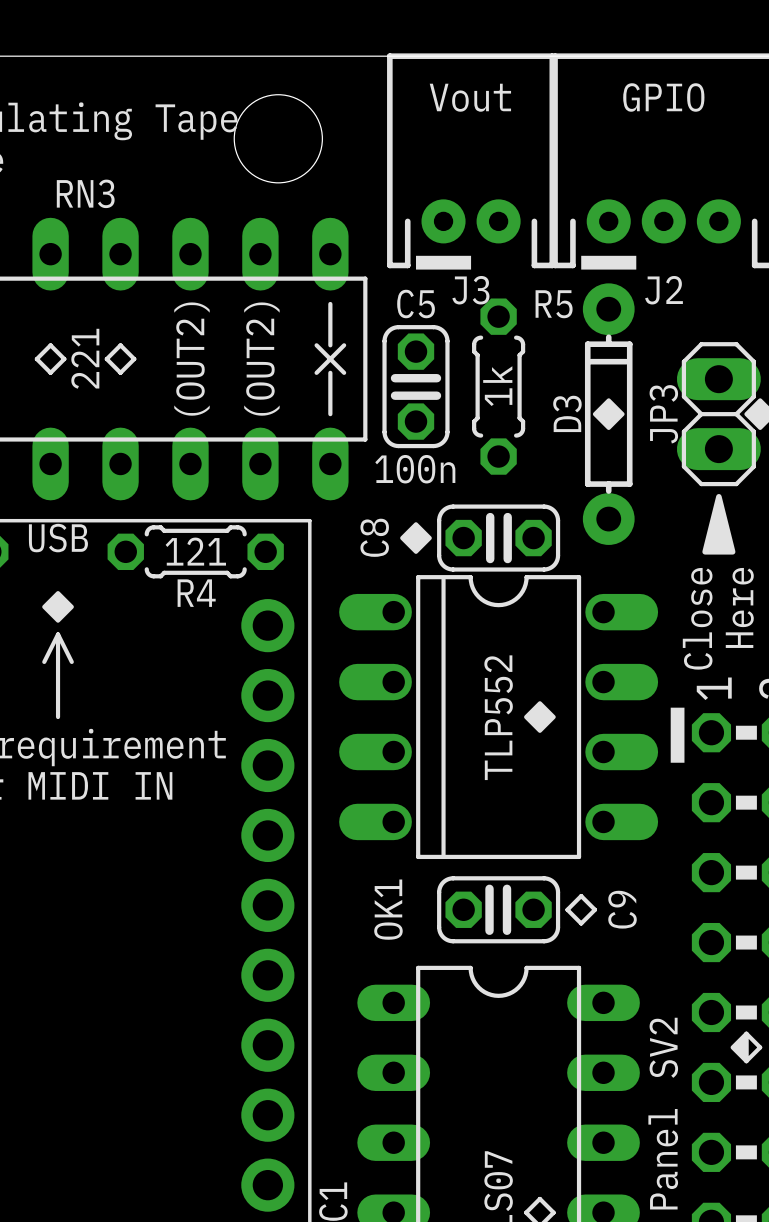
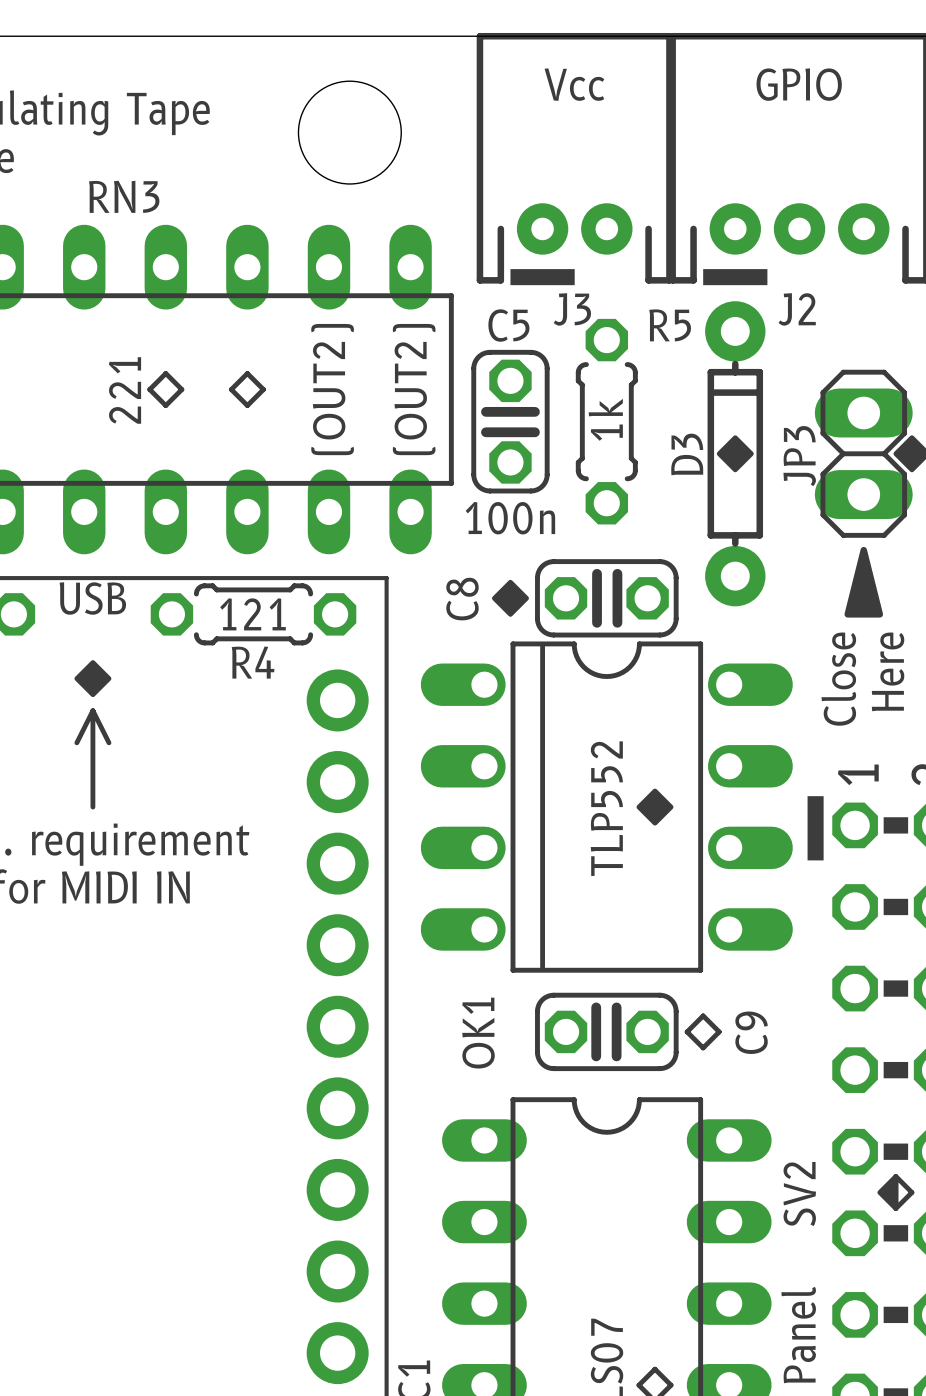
text: Vout (470, 97) -> Vcc (574, 84)
line: (330, 304) (330, 345) -> none
line: (50, 345) (36, 359) (50, 372) (64, 359) (50, 345) -> (247, 373) (231, 389) (247, 405) (263, 389) (247, 373)
line: (316, 345) (344, 372) -> none
line: (344, 345) (316, 372) -> none
text position: (OUT2) (191, 359) -> (OUT2) (414, 389)
line: (330, 372) (330, 414) -> none

